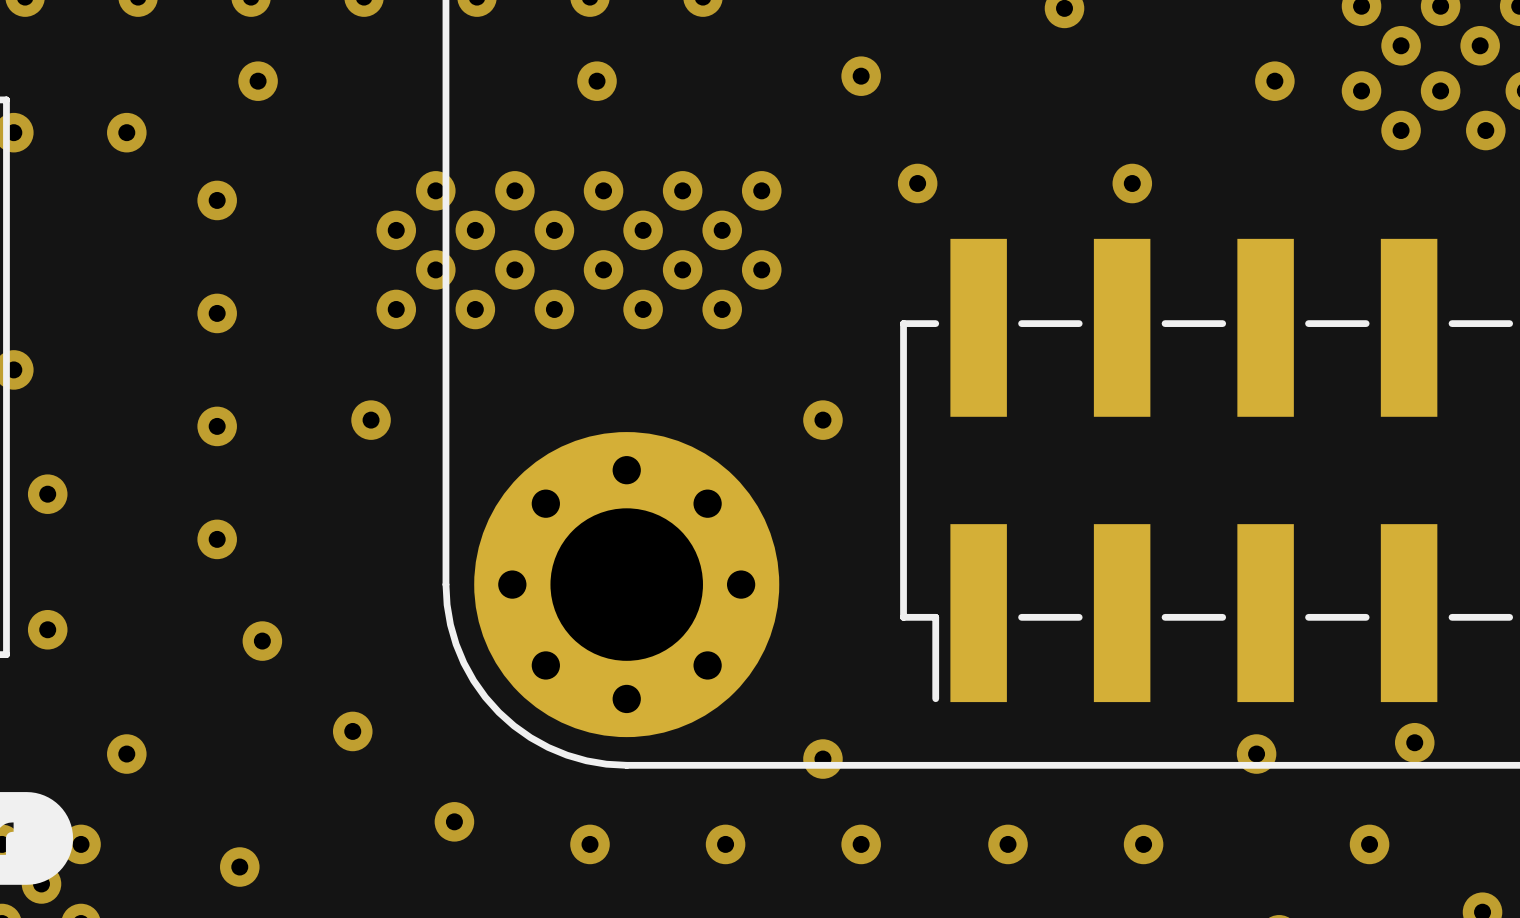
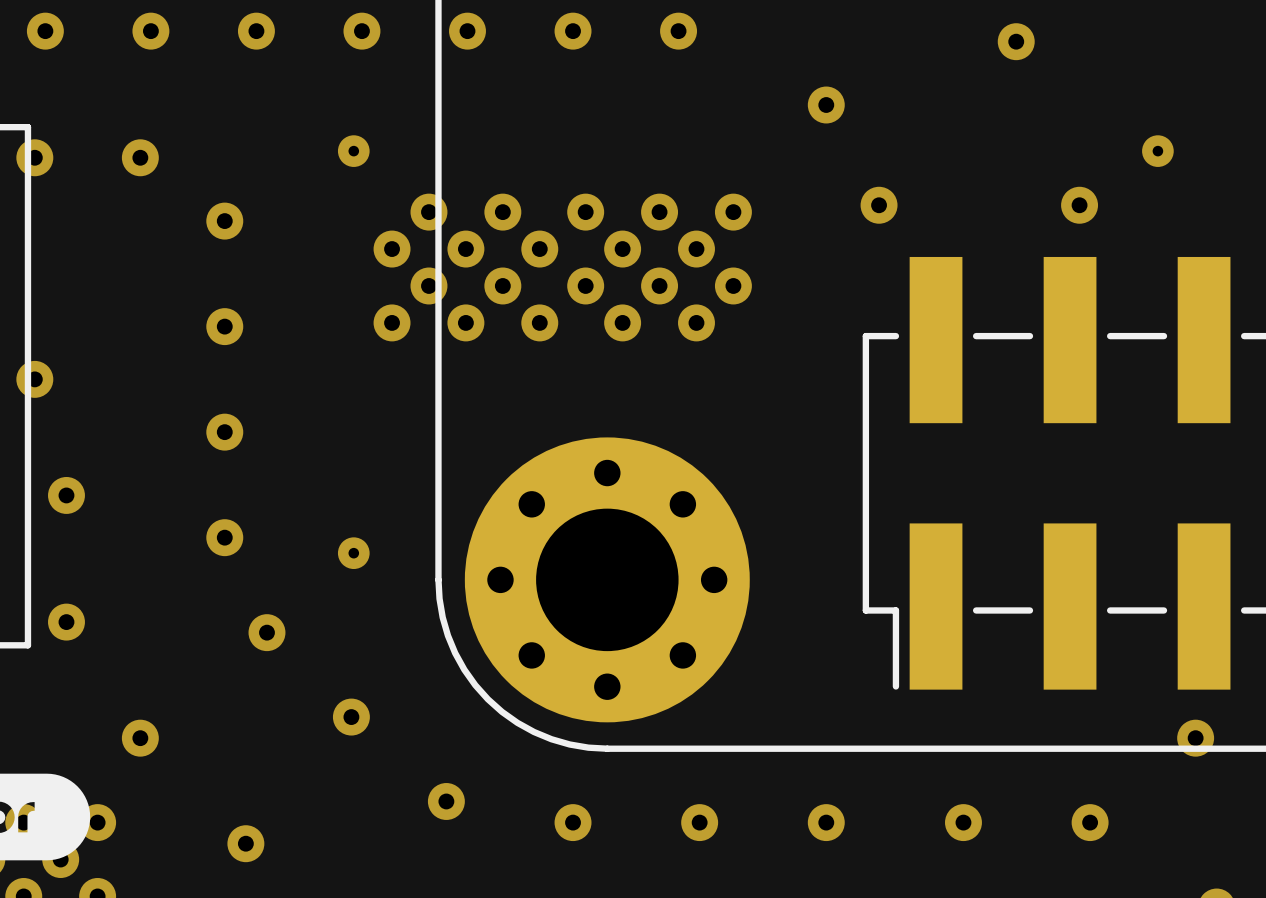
via: (258, 81) -> none
via: (597, 81) -> none
via: (1274, 81) -> none
via: none -> (353, 151)
via: none -> (1157, 151)
via: (371, 420) -> none
via: (822, 420) -> none
via: none -> (353, 553)
via: (822, 759) -> none

